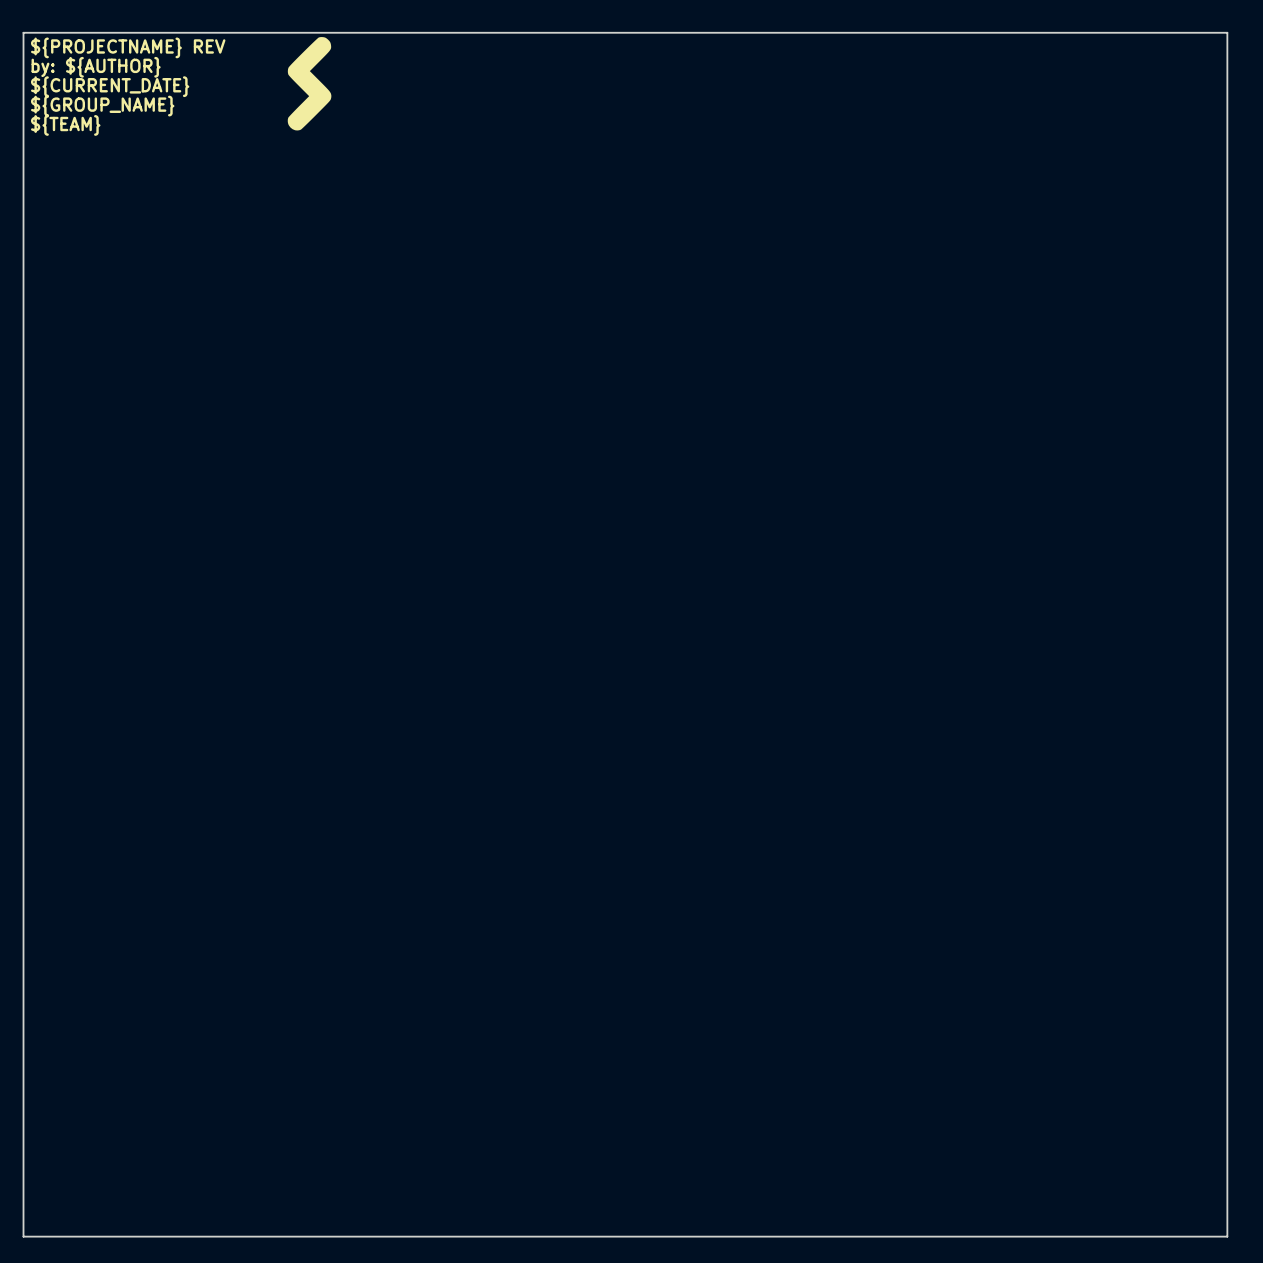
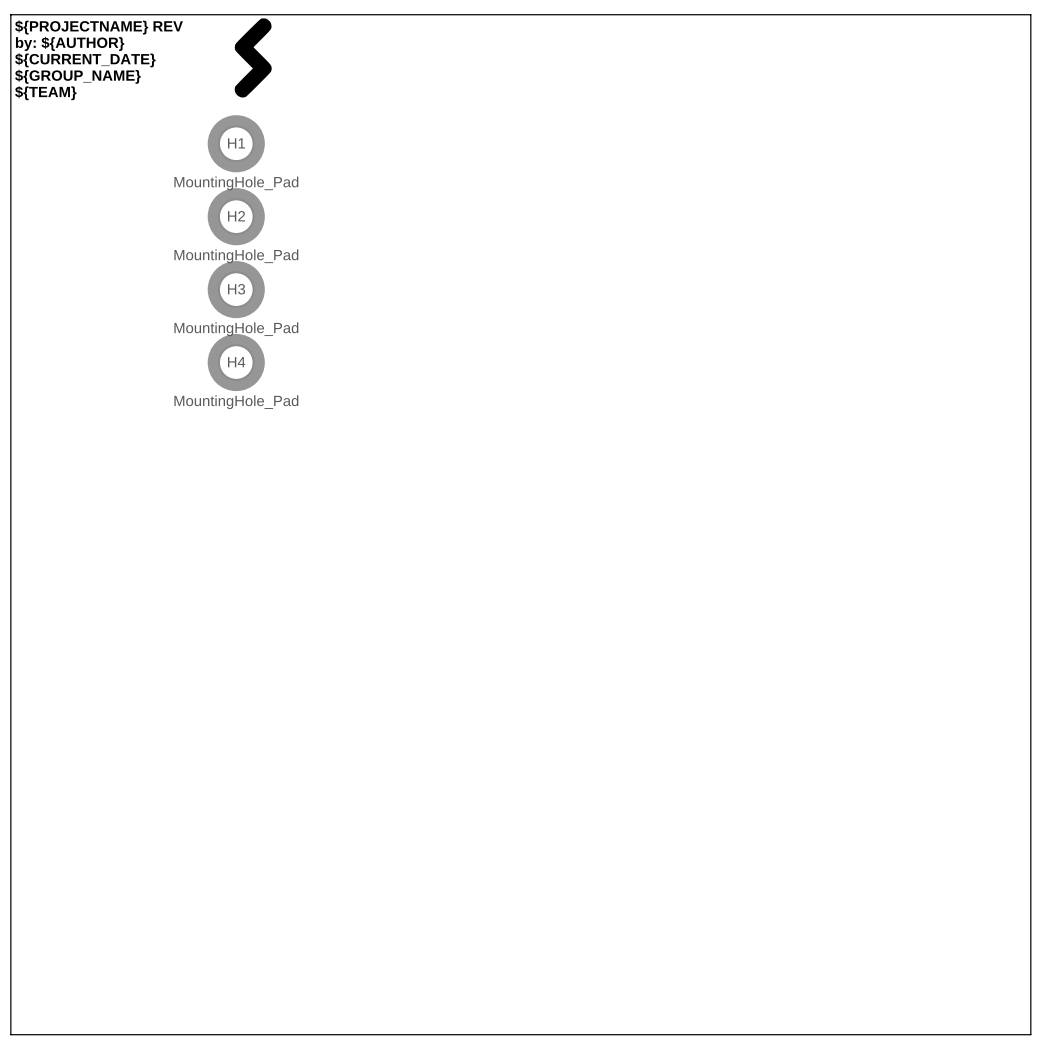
H1: none -> MountingHole_Pad (236, 143)
H2: none -> MountingHole_Pad (236, 216)
H3: none -> MountingHole_Pad (236, 289)
H4: none -> MountingHole_Pad (236, 362)

